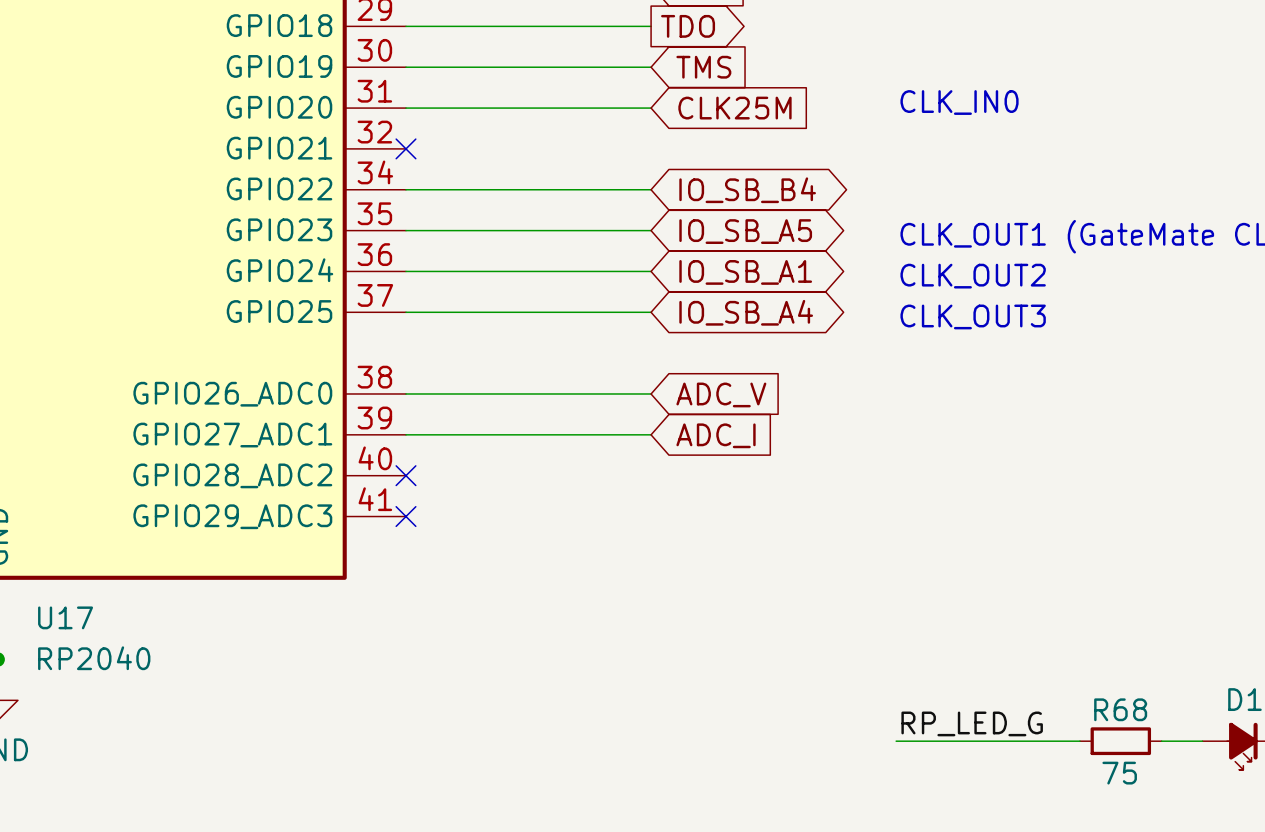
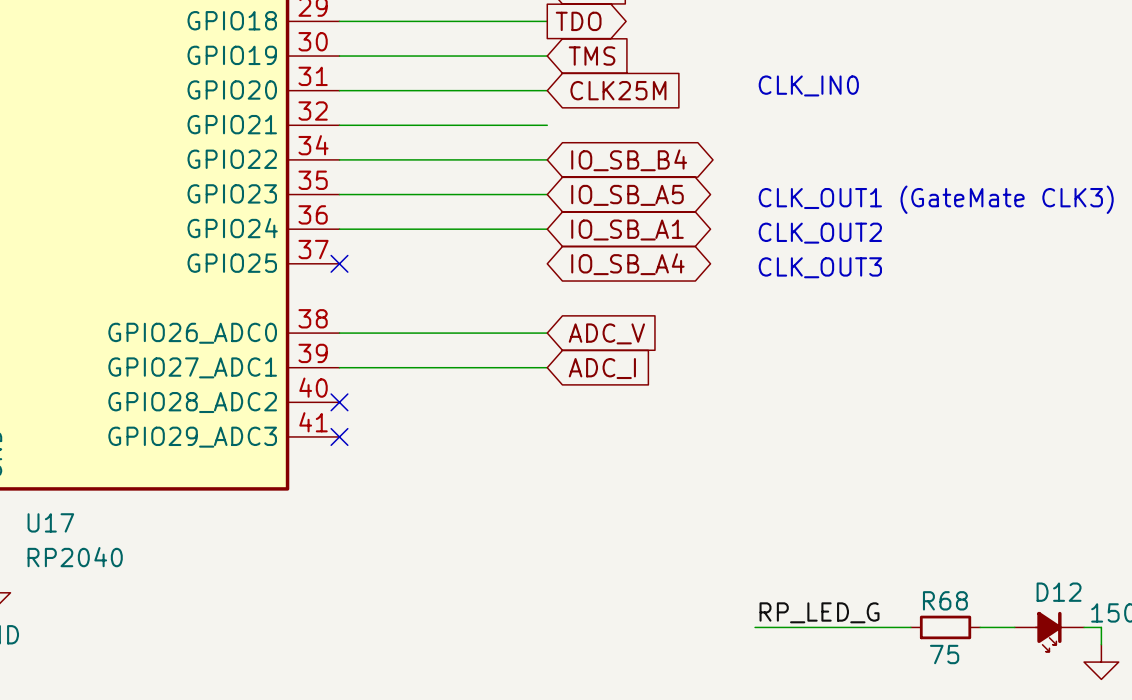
no-connect mark: (405, 148) -> none
wire: (405, 312) (651, 312) -> (339, 125) (547, 125)
no-connect mark: none -> (339, 263)

